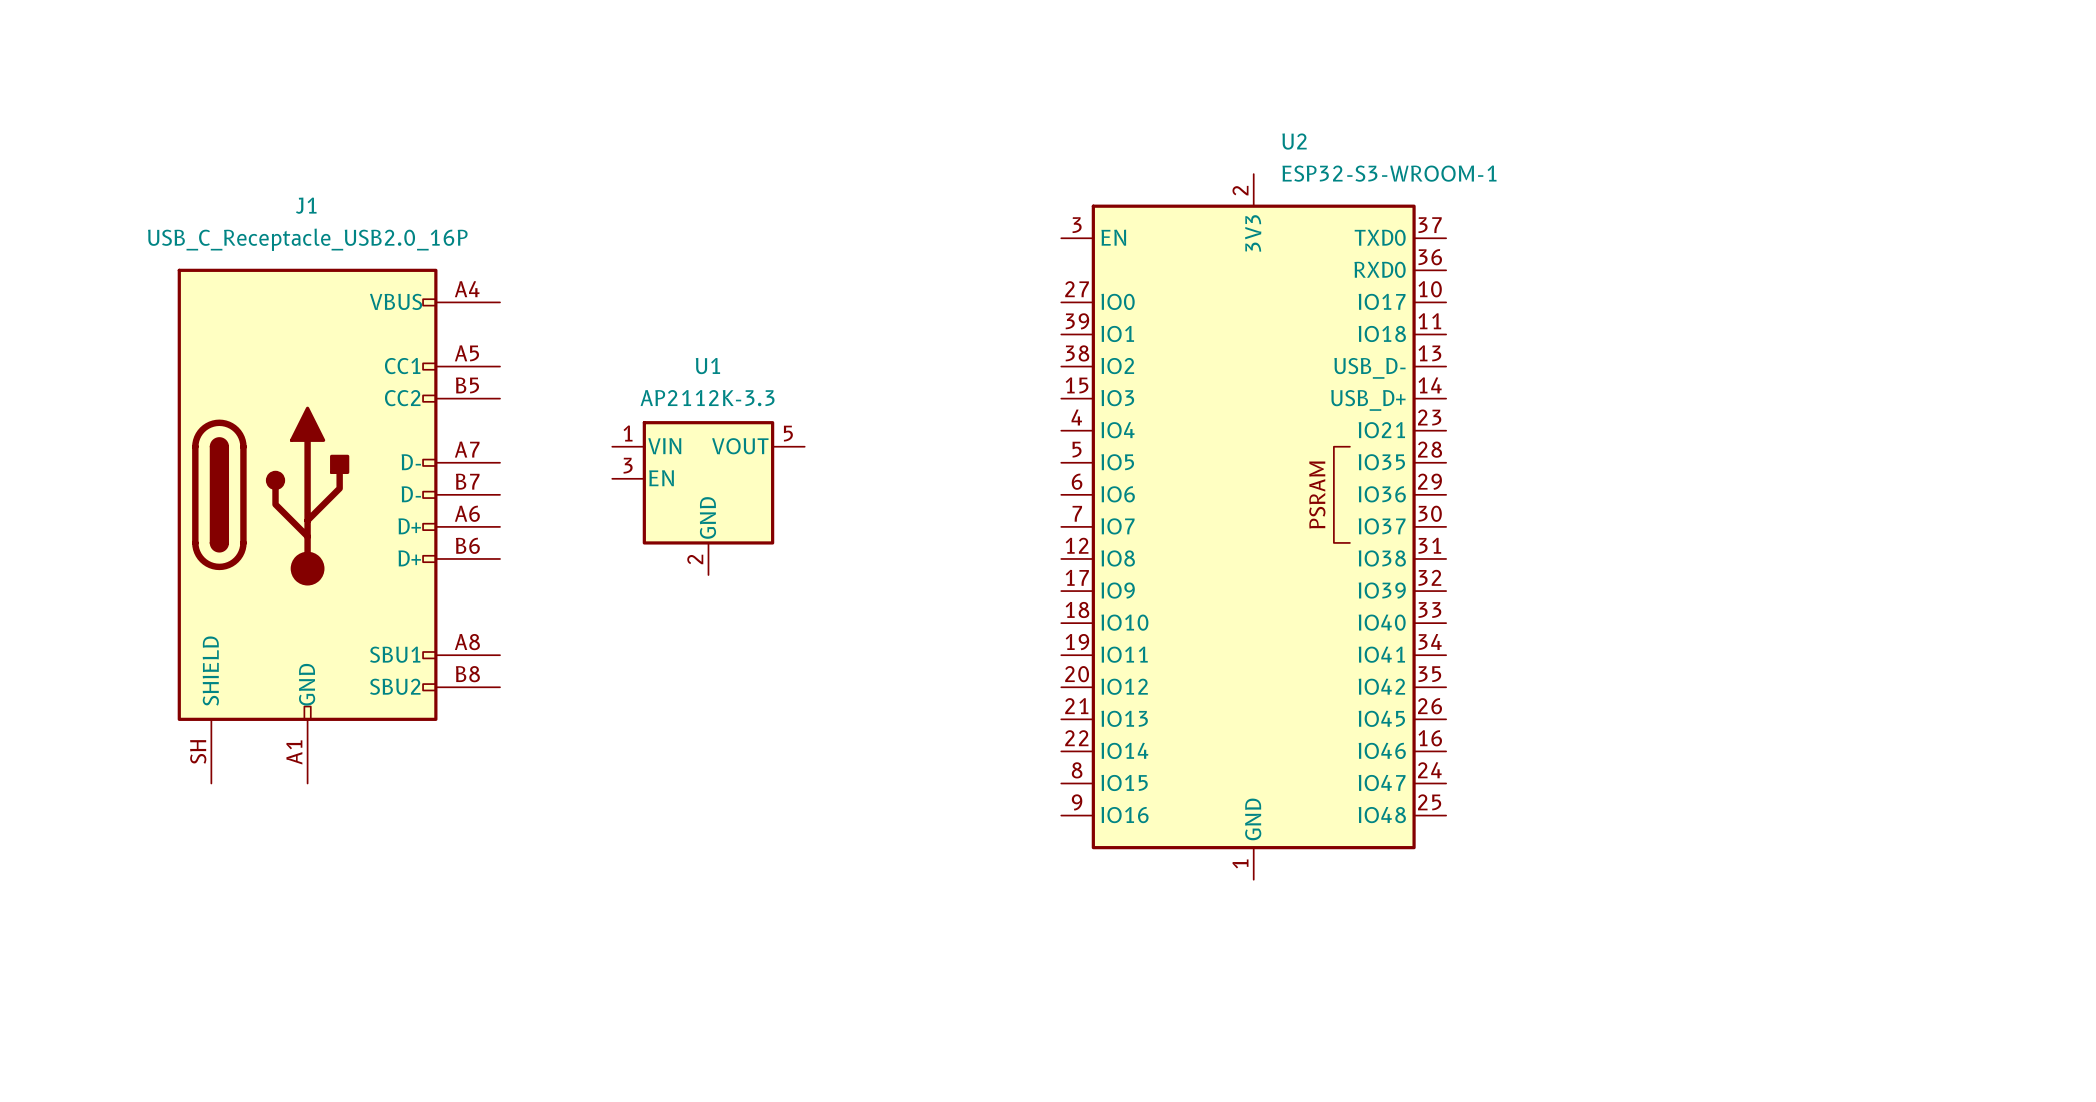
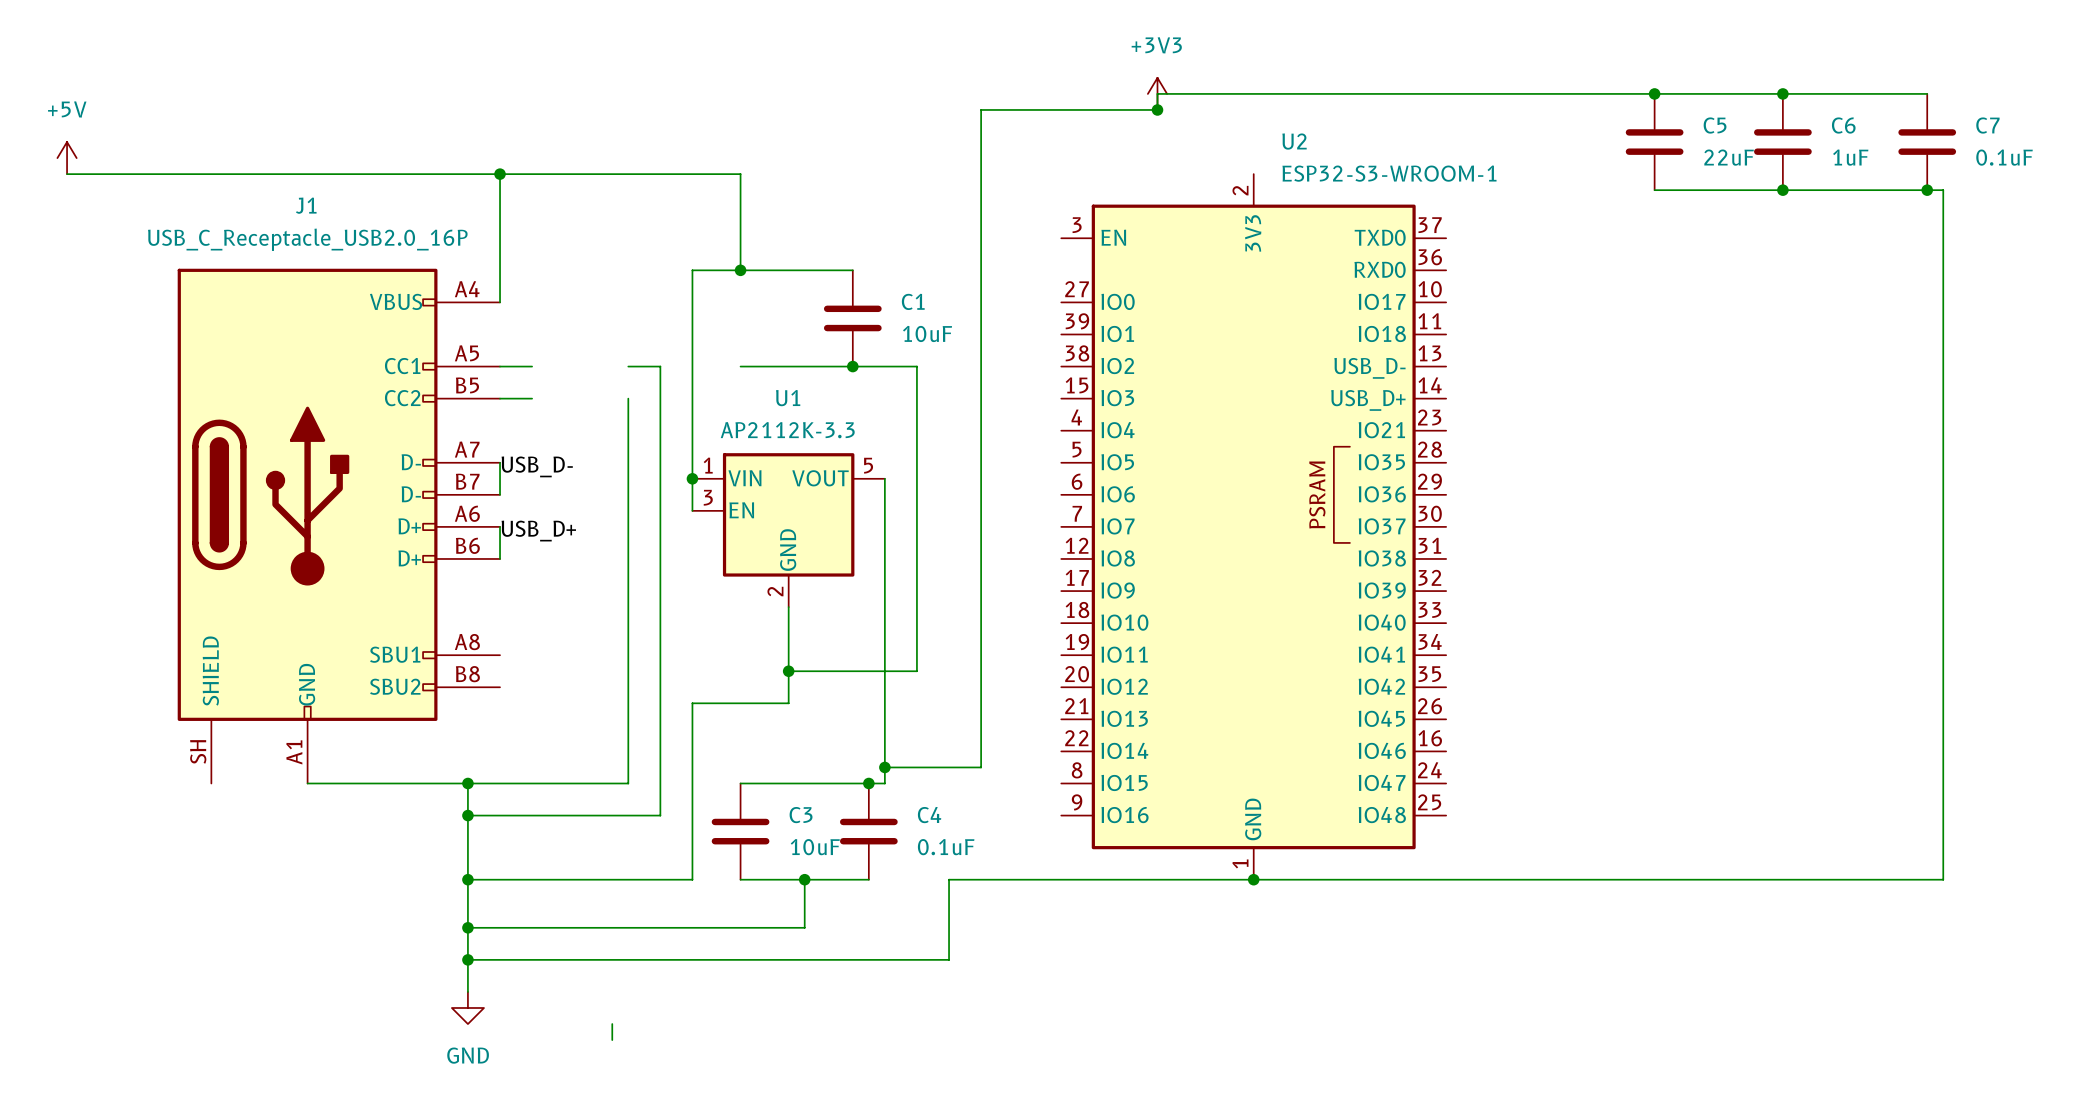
power symbol: none -> +3V3 (1157, 93)
junction: none -> (1654, 93)
junction: none -> (1782, 93)
wire: none -> (1927, 93) (1157, 93) (1157, 109) (981, 109) (981, 767) (884, 767)
junction: none -> (1157, 109)
C5: none -> 22uF (1654, 142)
C6: none -> 1uF (1782, 142)
C7: none -> 0.1uF (1927, 142)
power symbol: none -> +5V (67, 158)
wire: none -> (67, 174) (740, 174) (740, 270)
wire: none -> (500, 174) (500, 302)
junction: none -> (500, 174)
wire: none -> (1654, 190) (1943, 190) (1943, 879) (949, 879) (949, 959) (467, 959)
junction: none -> (1782, 190)
junction: none -> (1927, 190)
junction: none -> (740, 270)
wire: none -> (852, 270) (692, 270) (692, 510)
C1: none -> 10uF (852, 318)
wire: none -> (500, 366) (532, 366)
wire: none -> (628, 366) (660, 366) (660, 815) (467, 815)
wire: none -> (740, 366) (916, 366) (916, 671) (788, 671)
junction: none -> (852, 366)
wire: none -> (500, 398) (532, 398)
wire: none -> (628, 398) (628, 783) (307, 783)
wire: none -> (500, 462) (500, 494)
label: none -> USB_D- (537, 466)
junction: none -> (692, 478)
wire: none -> (884, 478) (884, 783) (740, 783)
U1 position: (708, 498) -> (788, 530)
wire: none -> (500, 526) (500, 558)
label: none -> USB_D+ (538, 531)
wire: none -> (788, 607) (788, 703) (692, 703) (692, 879) (467, 879)
junction: none -> (788, 671)
junction: none -> (884, 767)
wire: none -> (467, 783) (467, 991)
junction: none -> (467, 783)
junction: none -> (868, 783)
junction: none -> (467, 815)
C3: none -> 10uF (740, 831)
C4: none -> 0.1uF (868, 831)
junction: none -> (467, 879)
wire: none -> (740, 879) (868, 879)
wire: none -> (804, 879) (804, 927) (467, 927)
junction: none -> (804, 879)
junction: none -> (1253, 879)
junction: none -> (467, 927)
junction: none -> (467, 959)
power symbol: none -> GND (467, 1007)
wire: none -> (612, 1024) (612, 1040)

